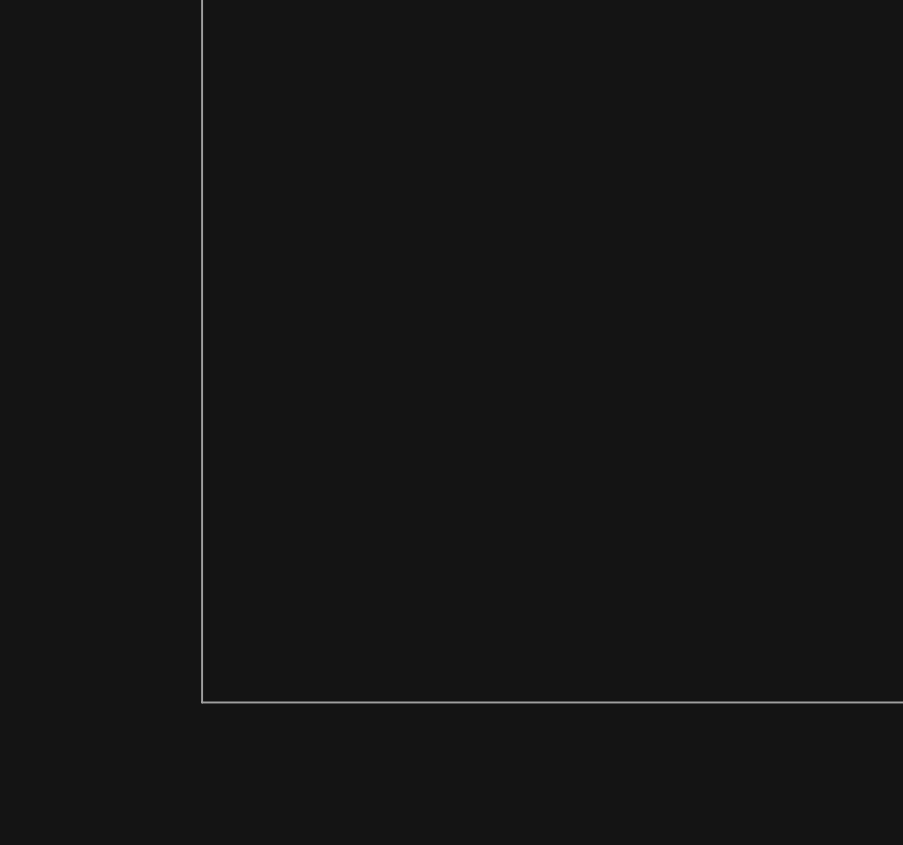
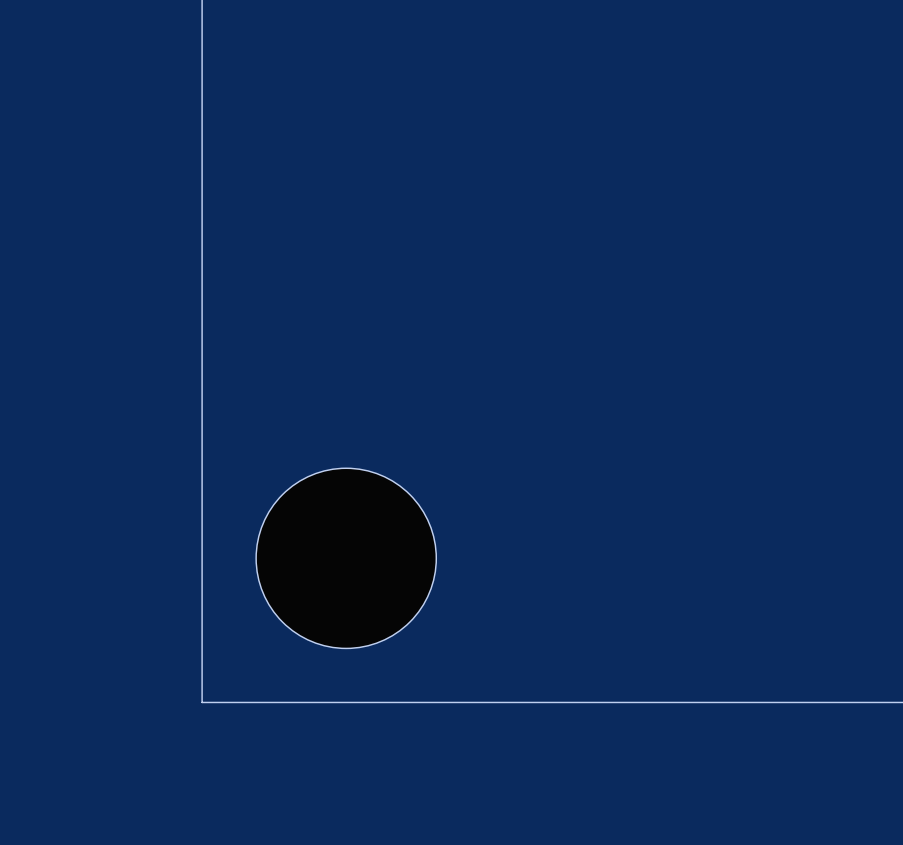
hole: none -> (346, 558)

